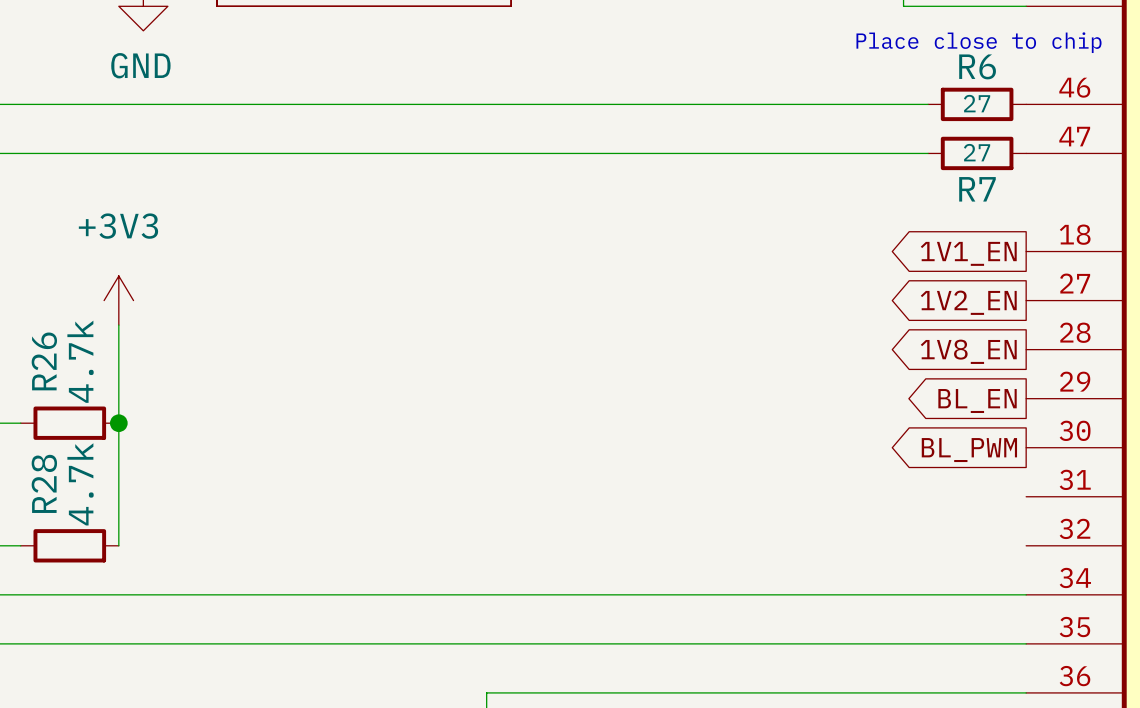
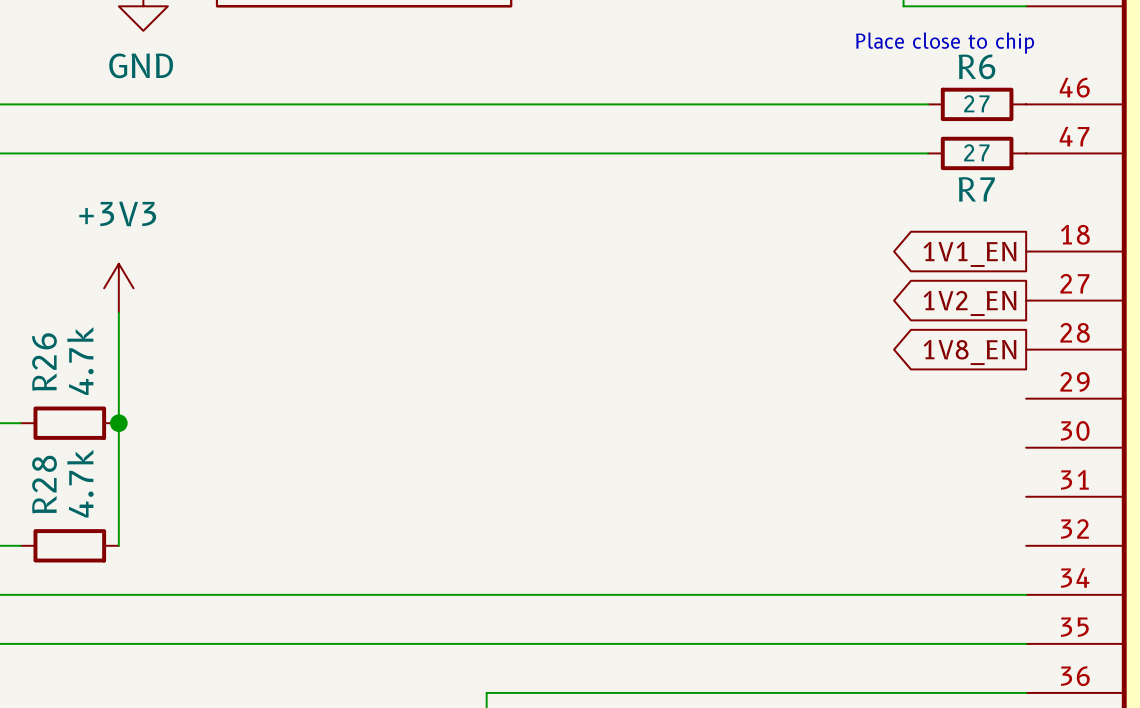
power symbol position: +3V3 (118, 300) -> +3V3 (118, 288)
global label: BL_EN (977, 401) -> none
global label: BL_PWM (969, 450) -> none

